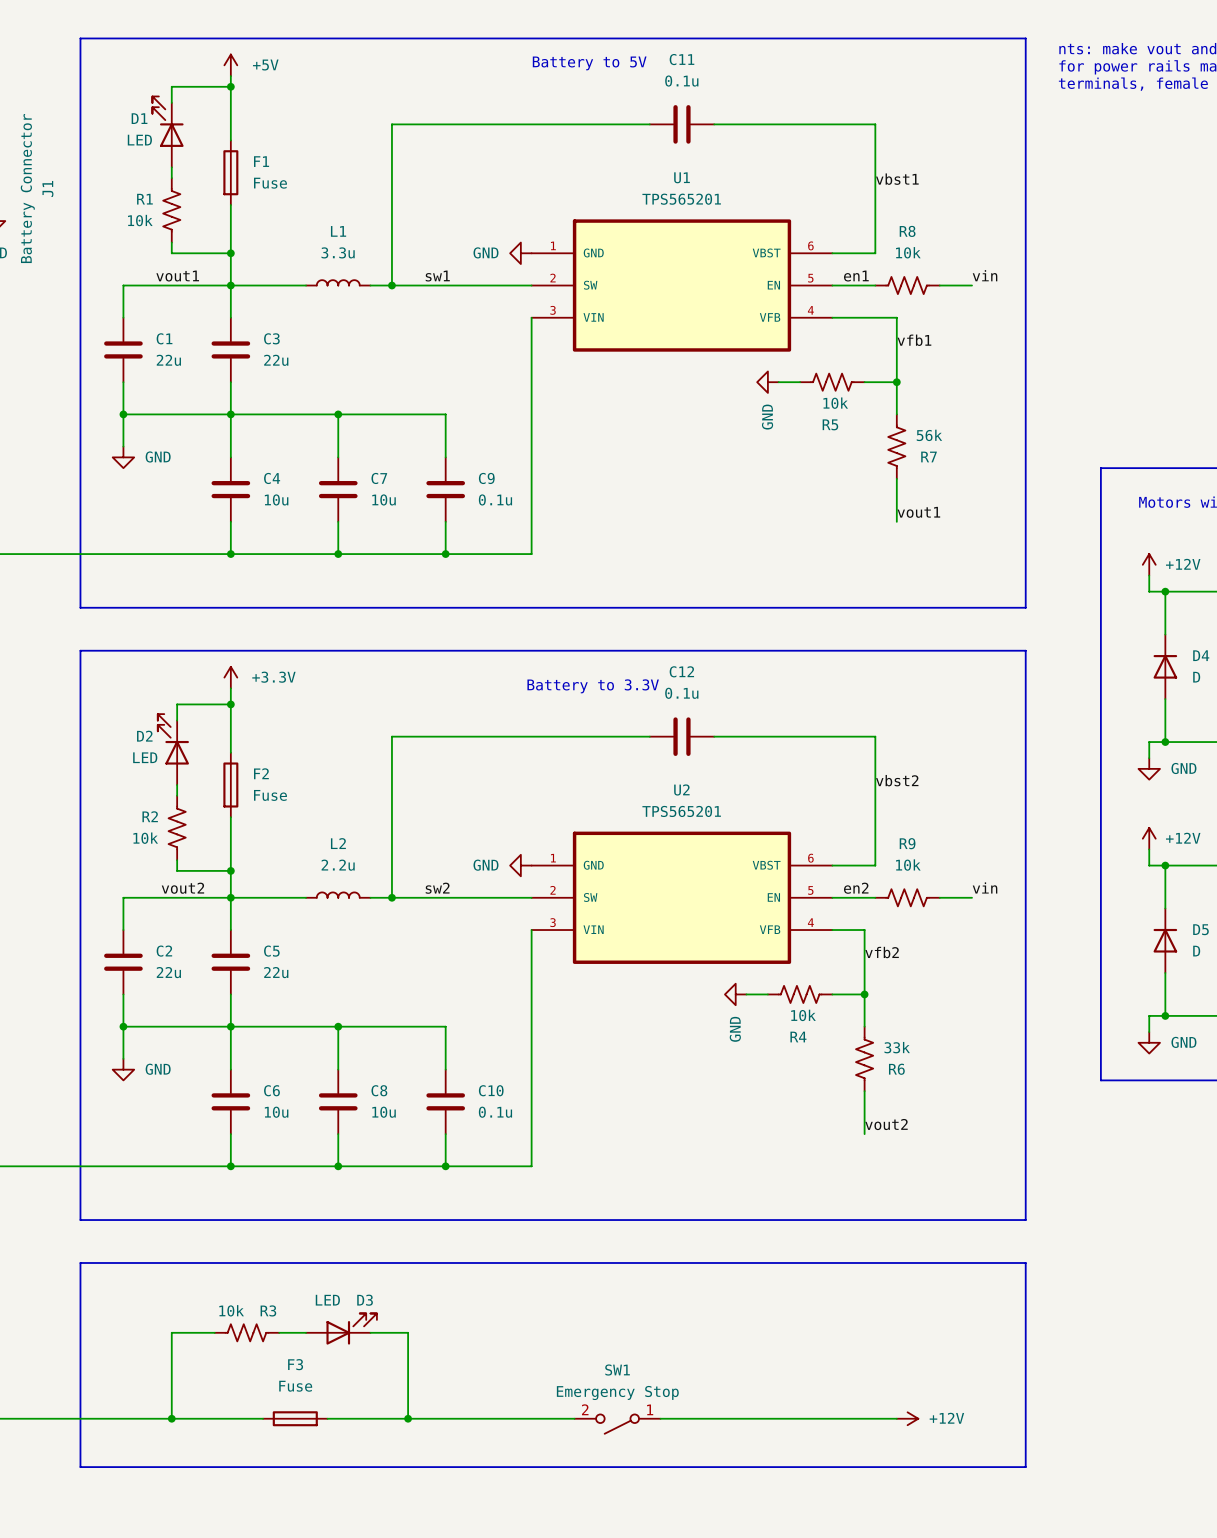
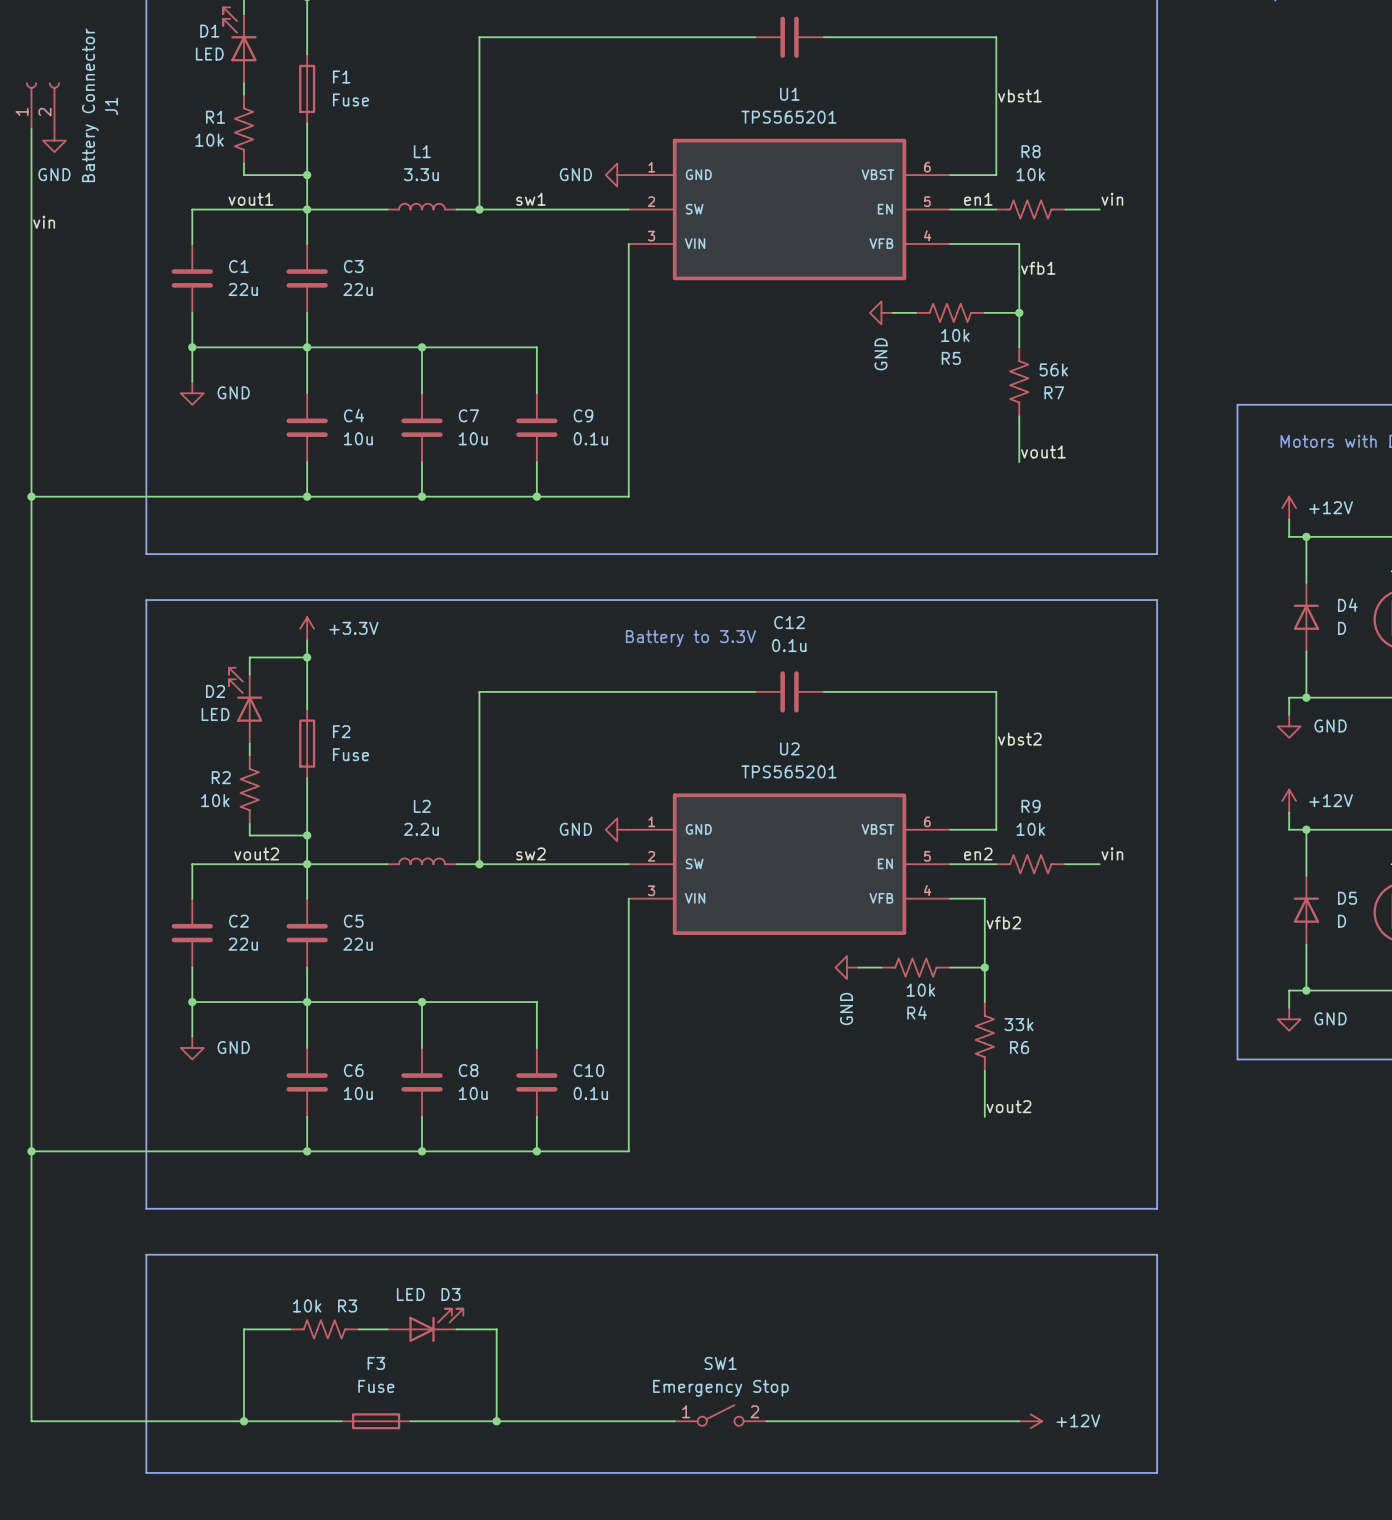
SW1 rotation: 0° (617, 1424) -> 180° (720, 1415)

